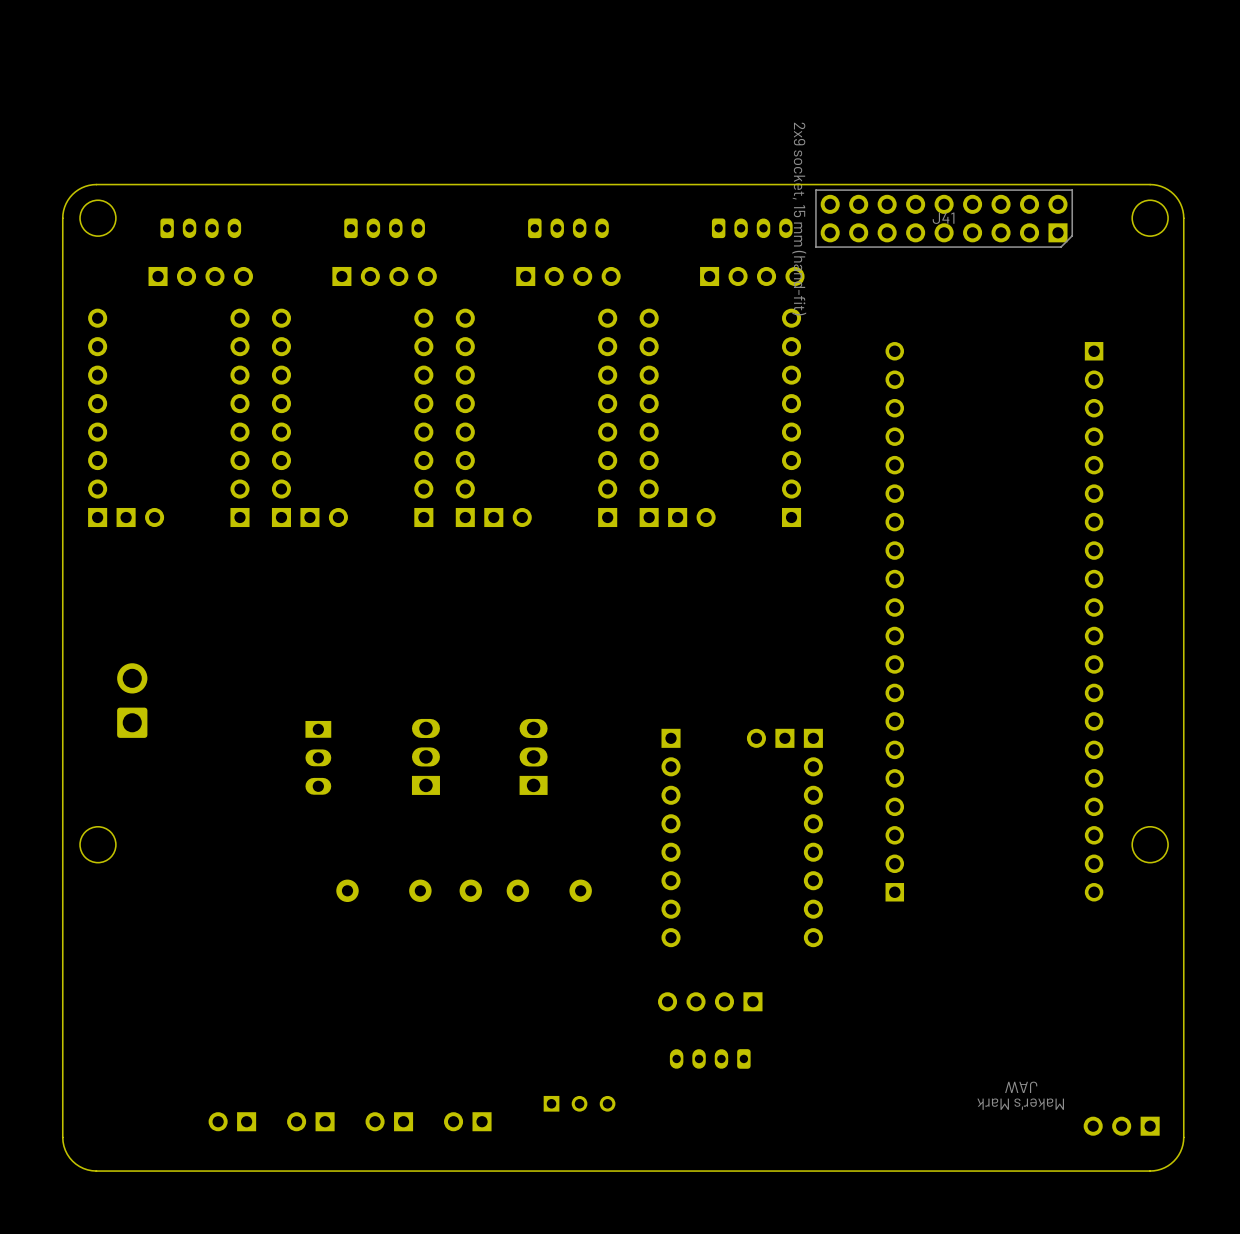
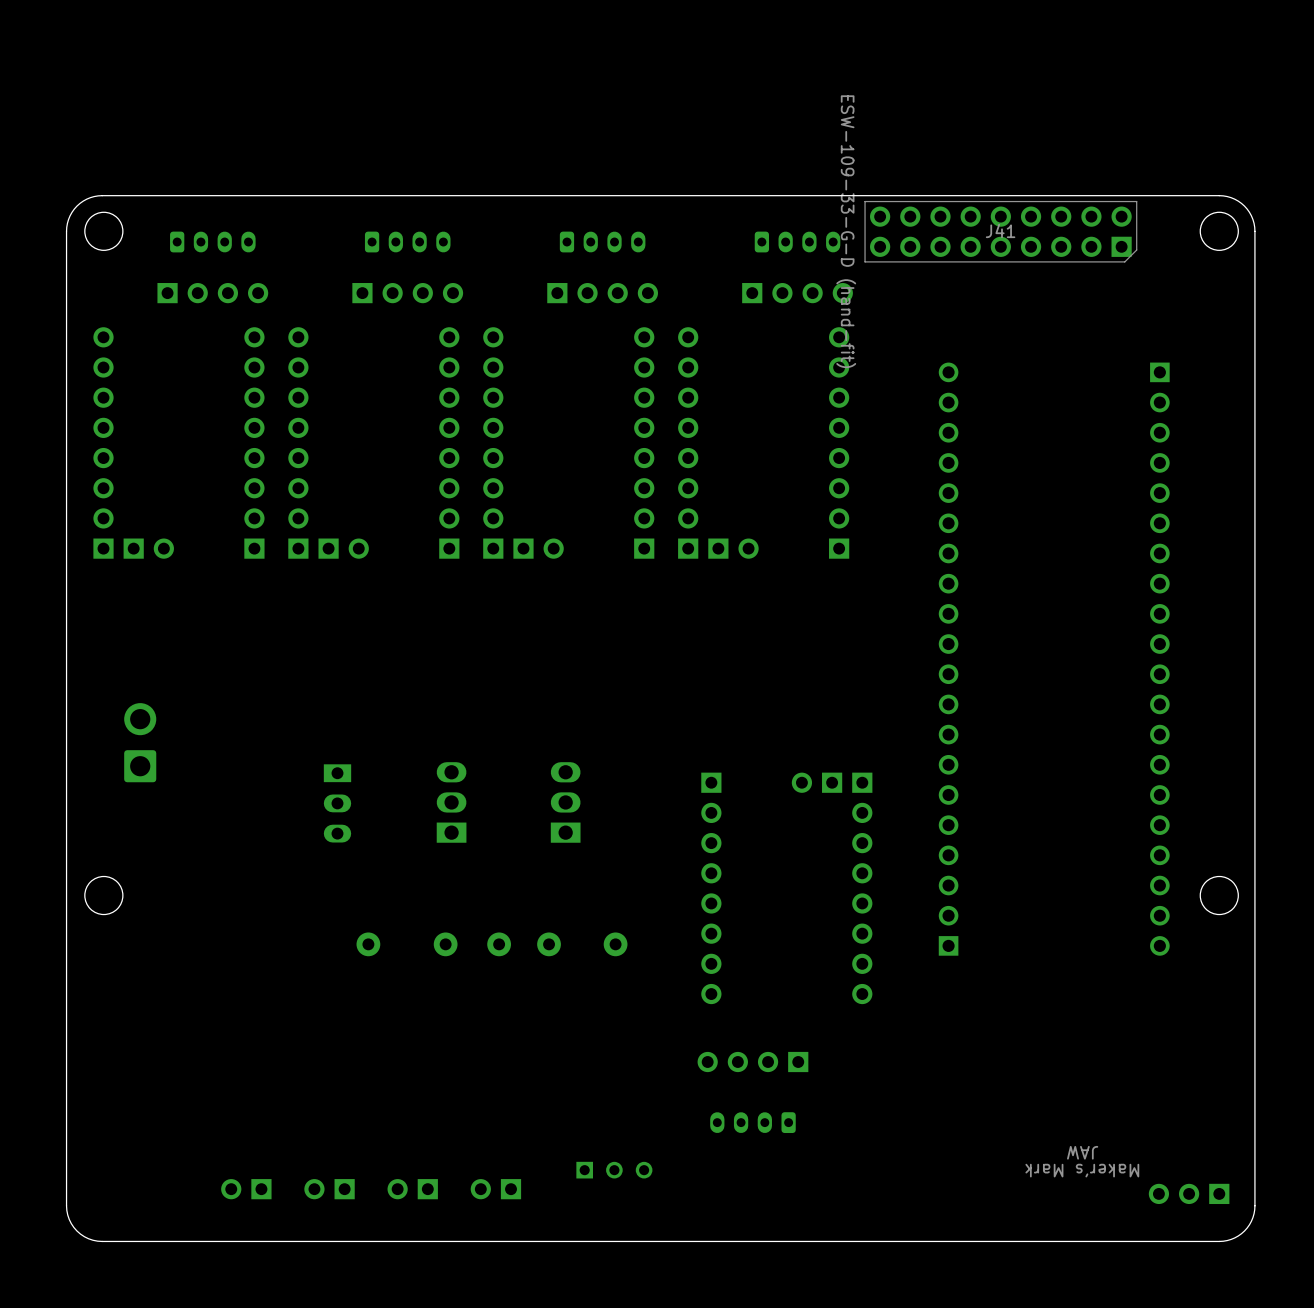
J41 value: 2x9 socket, 15 mm (hand-fit) (799, 219) -> ESW-109-33-G-D (hand-fit) (846, 231)

